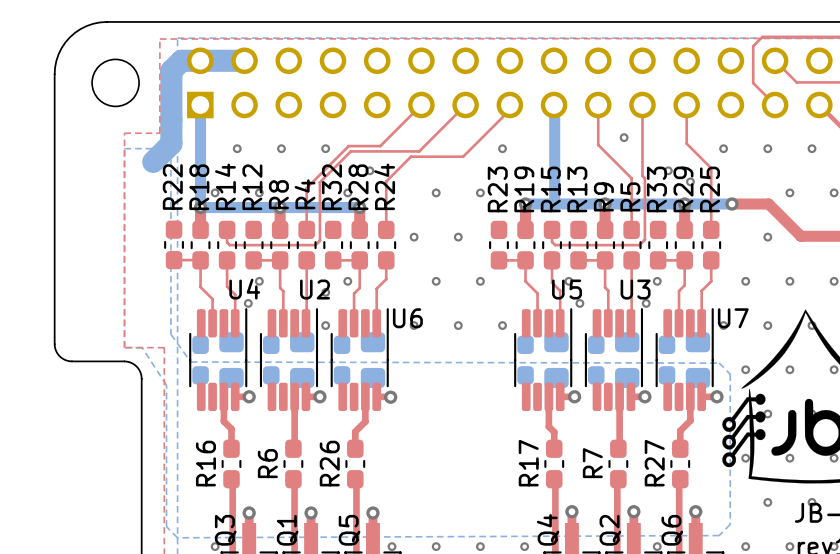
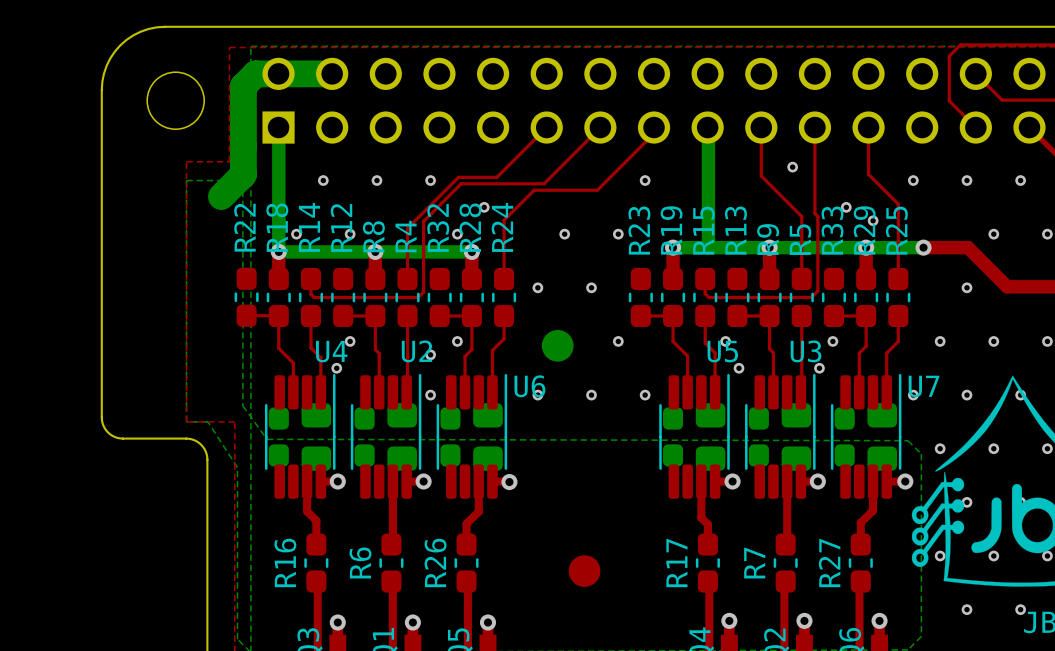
via: (436, 281) -> none
part: none -> (557, 345)
part: none -> (584, 571)

